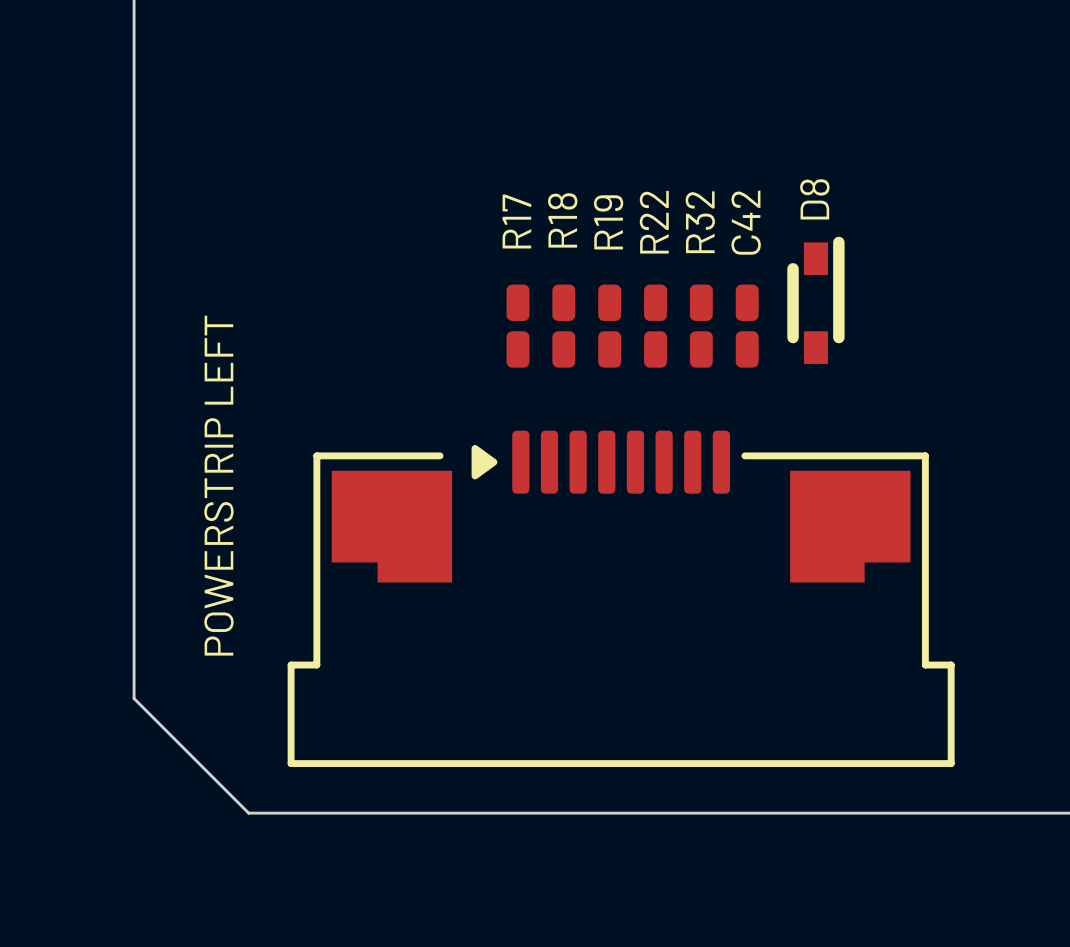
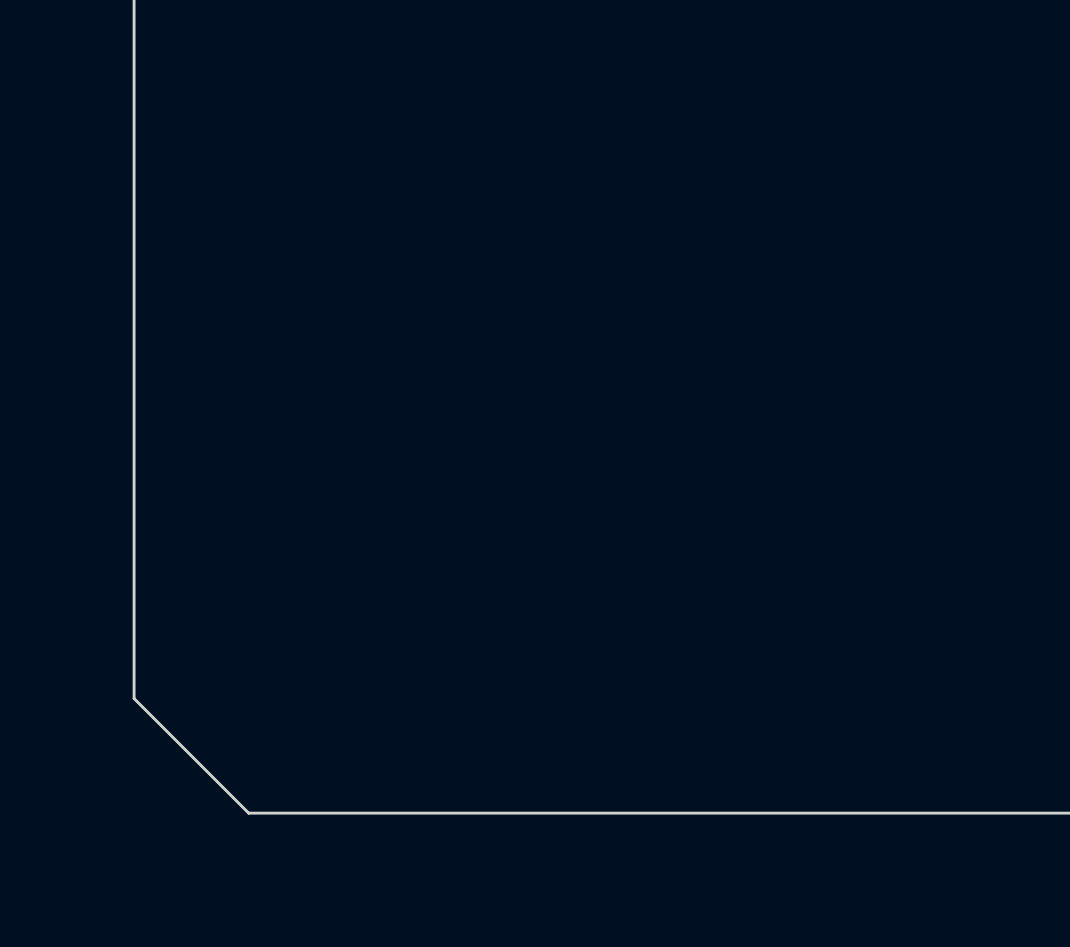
D8: (815, 300) -> none
R17: (517, 326) -> none
R18: (563, 326) -> none
R19: (609, 326) -> none
R22: (655, 326) -> none
R32: (701, 326) -> none
C42: (747, 326) -> none
POWERSTRIP LEFT: (621, 598) -> none

